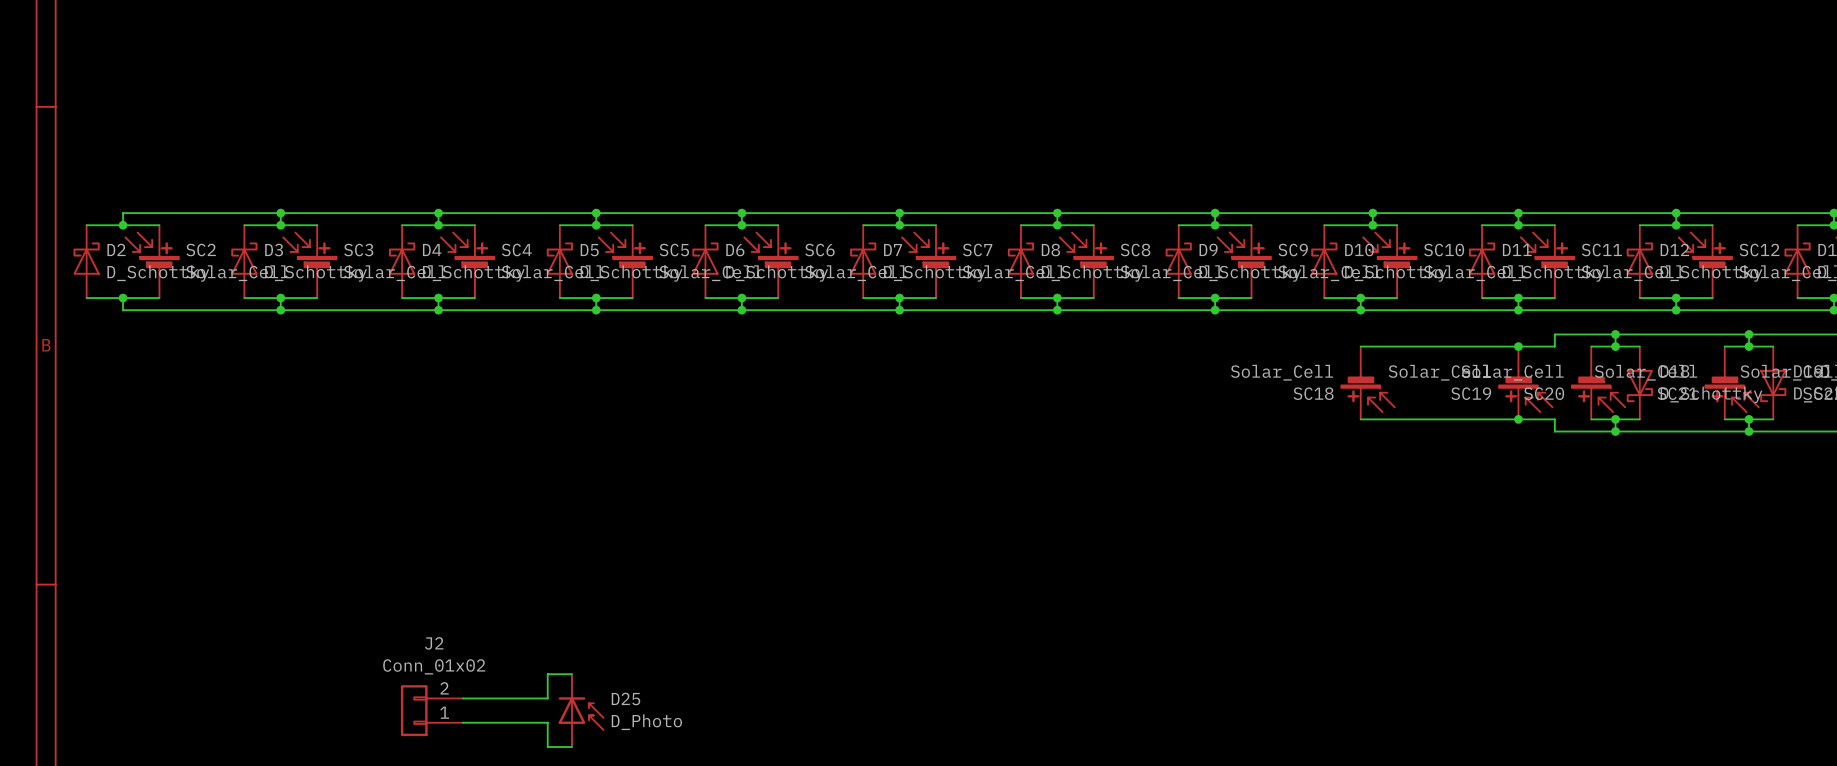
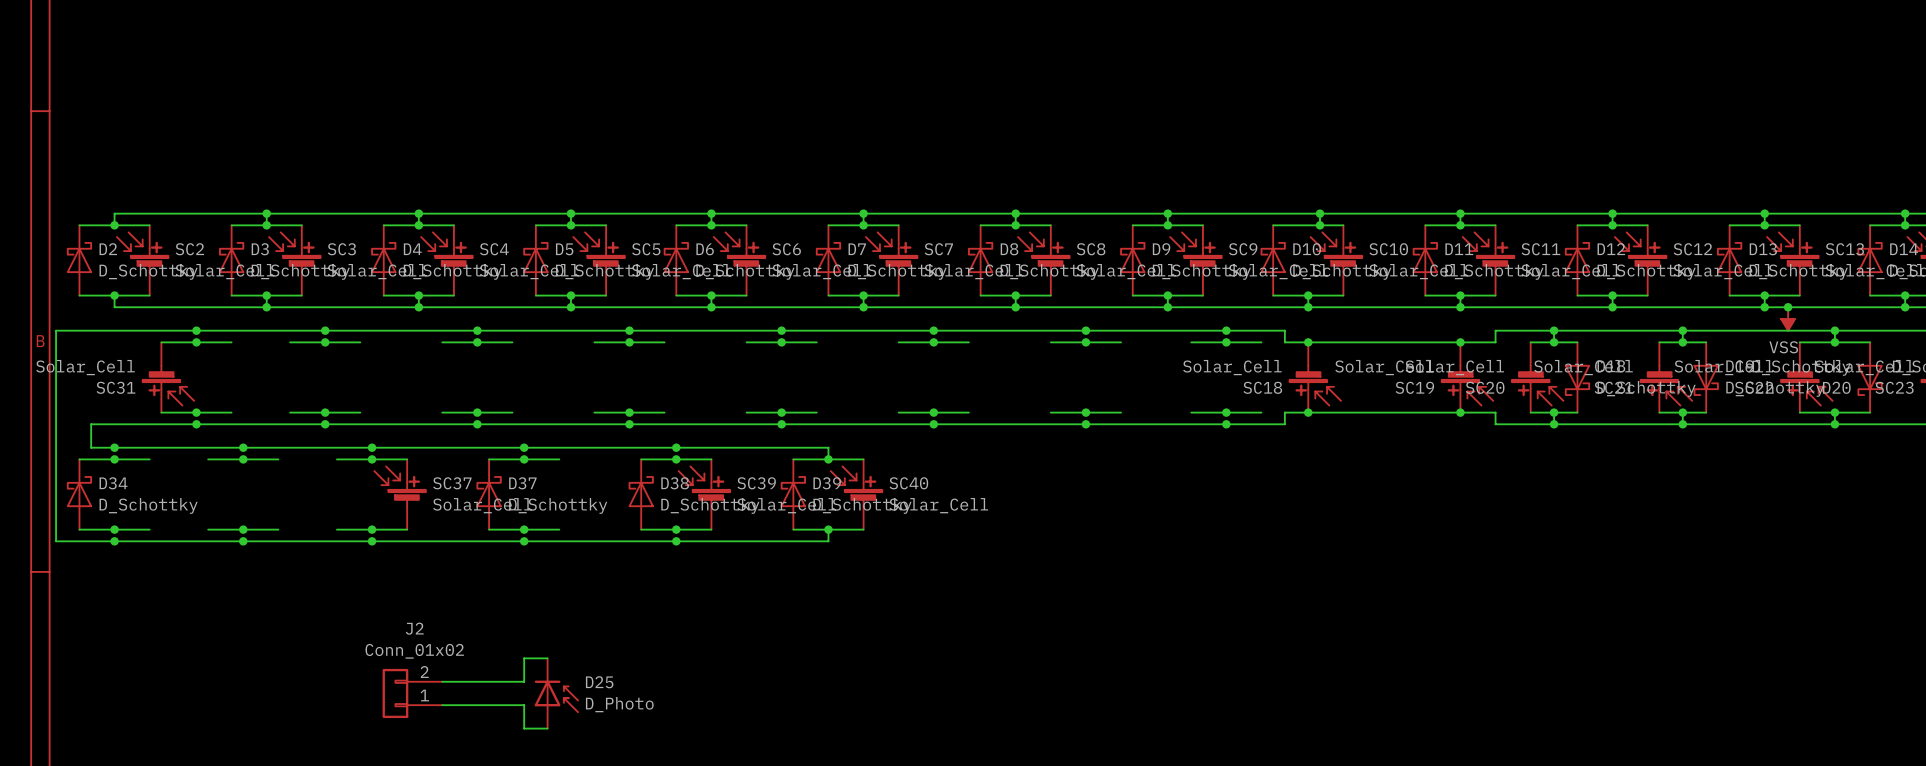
junction: none -> (196, 330)
junction: none -> (325, 330)
junction: none -> (477, 330)
junction: none -> (629, 330)
junction: none -> (781, 330)
junction: none -> (933, 330)
junction: none -> (1085, 330)
junction: none -> (1226, 330)
wire: none -> (161, 342) (231, 342)
junction: none -> (196, 342)
wire: none -> (290, 342) (360, 342)
junction: none -> (325, 342)
wire: none -> (442, 342) (512, 342)
junction: none -> (477, 342)
wire: none -> (594, 342) (664, 342)
junction: none -> (629, 342)
wire: none -> (746, 342) (816, 342)
junction: none -> (781, 342)
wire: none -> (898, 342) (968, 342)
junction: none -> (933, 342)
wire: none -> (1050, 342) (1121, 342)
junction: none -> (1085, 342)
wire: none -> (1191, 342) (1261, 342)
junction: none -> (1226, 342)
wire: none -> (1308, 342) (1284, 342) (1284, 330) (56, 330) (56, 541) (828, 541) (828, 529)
junction: none -> (1308, 342)
SC31: none -> Solar_Cell (168, 377)
wire: none -> (161, 412) (231, 412)
junction: none -> (196, 412)
wire: none -> (290, 412) (360, 412)
junction: none -> (325, 412)
wire: none -> (442, 412) (512, 412)
junction: none -> (477, 412)
wire: none -> (594, 412) (664, 412)
junction: none -> (629, 412)
wire: none -> (746, 412) (816, 412)
junction: none -> (781, 412)
wire: none -> (898, 412) (968, 412)
junction: none -> (933, 412)
wire: none -> (1050, 412) (1121, 412)
junction: none -> (1085, 412)
wire: none -> (1191, 412) (1261, 412)
junction: none -> (1226, 412)
wire: none -> (1308, 412) (1284, 412) (1284, 424) (91, 424) (91, 447) (828, 447) (828, 459)
junction: none -> (1308, 412)
junction: none -> (196, 424)
junction: none -> (325, 424)
junction: none -> (477, 424)
junction: none -> (629, 424)
junction: none -> (781, 424)
junction: none -> (933, 424)
junction: none -> (1085, 424)
junction: none -> (1226, 424)
junction: none -> (114, 447)
junction: none -> (243, 447)
junction: none -> (372, 447)
junction: none -> (524, 447)
junction: none -> (676, 447)
wire: none -> (79, 459) (149, 459)
junction: none -> (114, 459)
wire: none -> (208, 459) (278, 459)
junction: none -> (243, 459)
wire: none -> (336, 459) (407, 459)
junction: none -> (372, 459)
wire: none -> (489, 459) (559, 459)
junction: none -> (524, 459)
wire: none -> (641, 459) (711, 459)
junction: none -> (676, 459)
wire: none -> (793, 459) (863, 459)
junction: none -> (828, 459)
D34: none -> D_Schottky (79, 494)
SC37: none -> Solar_Cell (400, 494)
D37: none -> D_Schottky (489, 494)
D38: none -> D_Schottky (641, 494)
SC39: none -> Solar_Cell (704, 494)
D39: none -> D_Schottky (793, 494)
SC40: none -> Solar_Cell (856, 494)
wire: none -> (79, 529) (149, 529)
junction: none -> (114, 529)
wire: none -> (208, 529) (278, 529)
junction: none -> (243, 529)
wire: none -> (336, 529) (407, 529)
junction: none -> (372, 529)
wire: none -> (489, 529) (559, 529)
junction: none -> (524, 529)
wire: none -> (641, 529) (711, 529)
junction: none -> (676, 529)
wire: none -> (793, 529) (863, 529)
junction: none -> (828, 529)
junction: none -> (114, 541)
junction: none -> (243, 541)
junction: none -> (372, 541)
junction: none -> (524, 541)
junction: none -> (676, 541)

